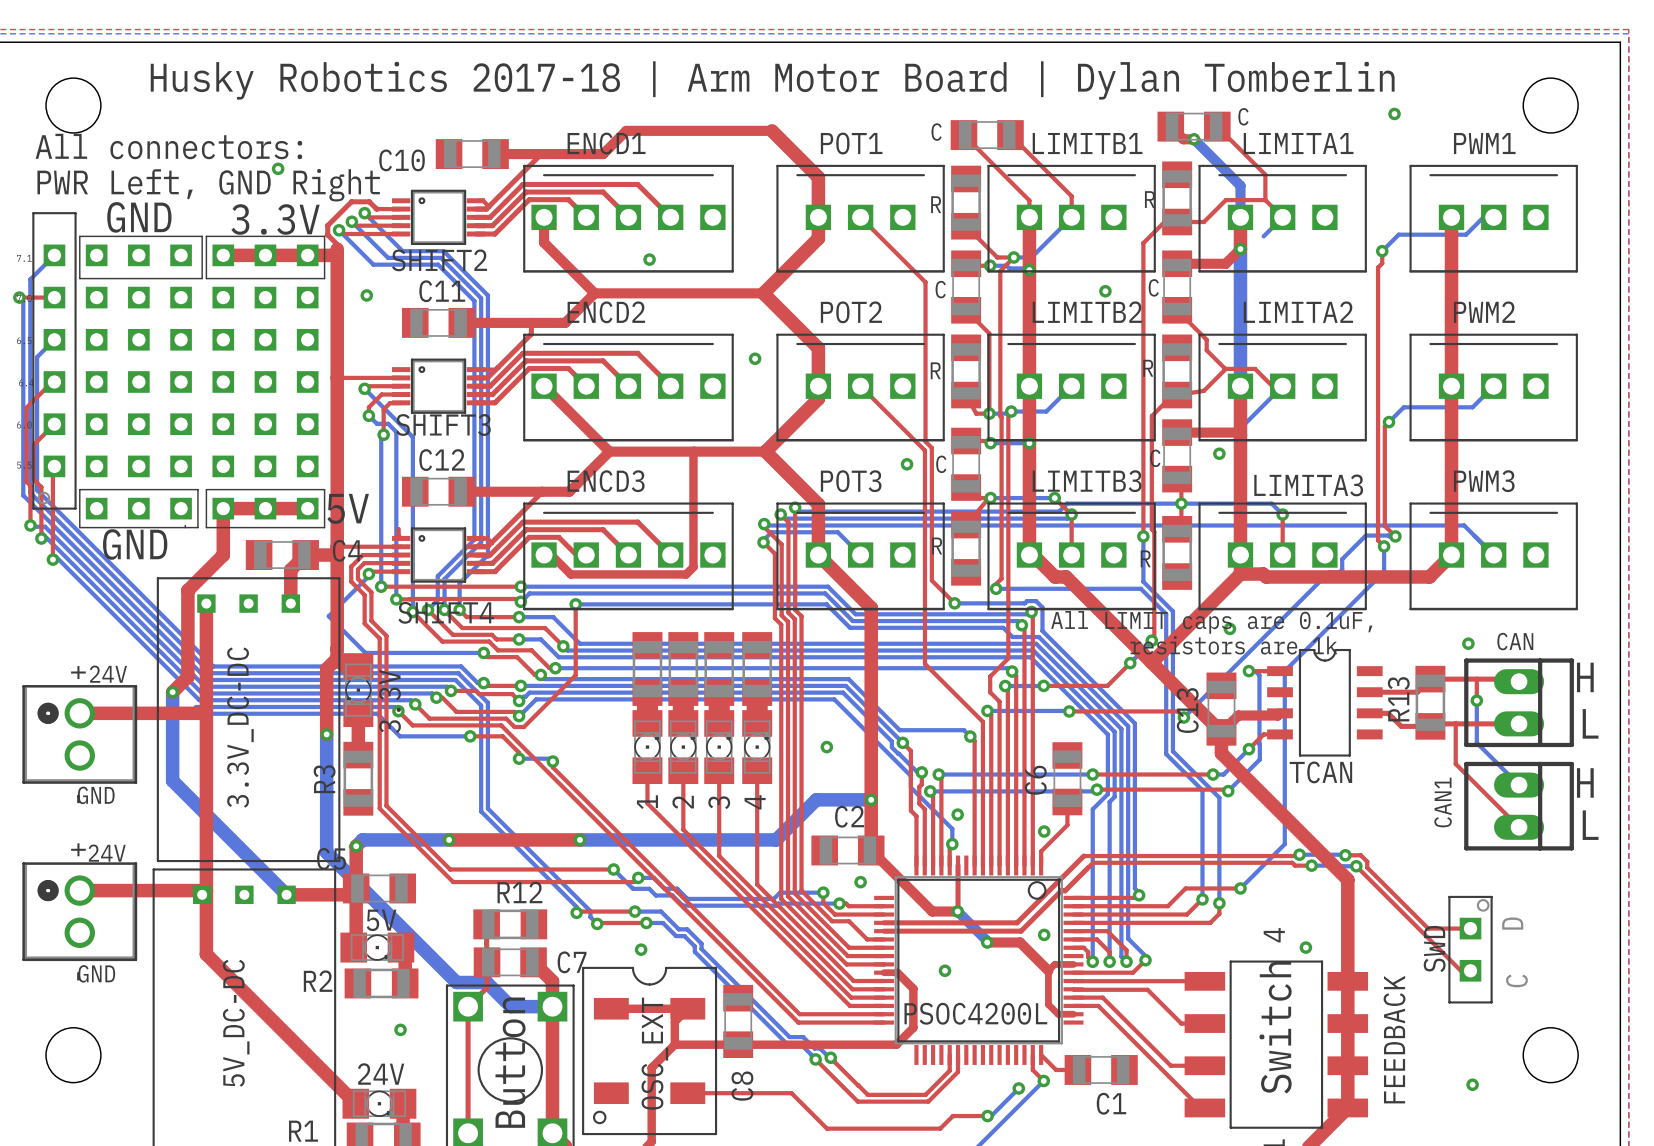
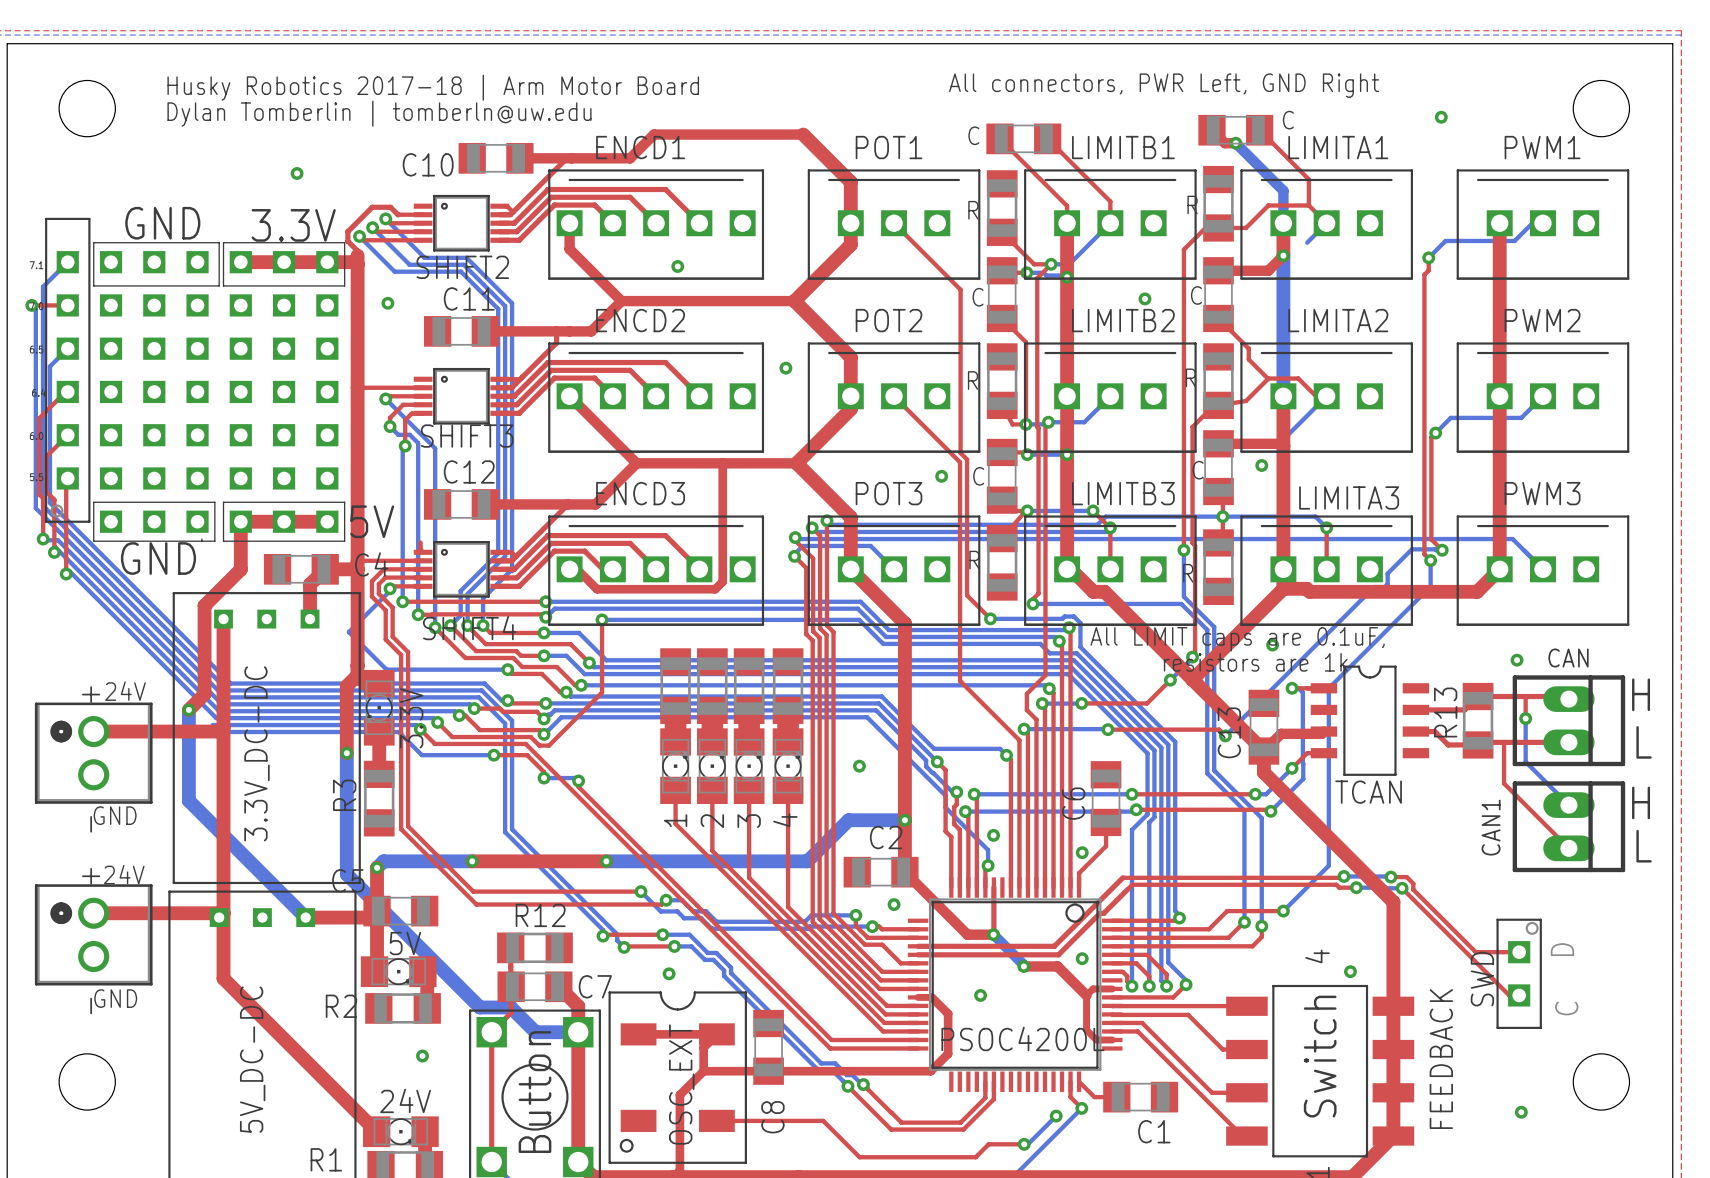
text: Husky Robotics 2017-18 | Arm Motor Board | Dylan Tomberlin (772, 80) -> Husky Robotics 2017-18 | Arm Motor Board (433, 87)
text: none -> All connectors, PWR Left, GND Right (1164, 85)
text: none -> Dylan Tomberlin | tomberln@uw.edu (379, 113)
text: All connectors: (168, 146) -> none
text: PWR Left, GND Right (208, 185) -> none

